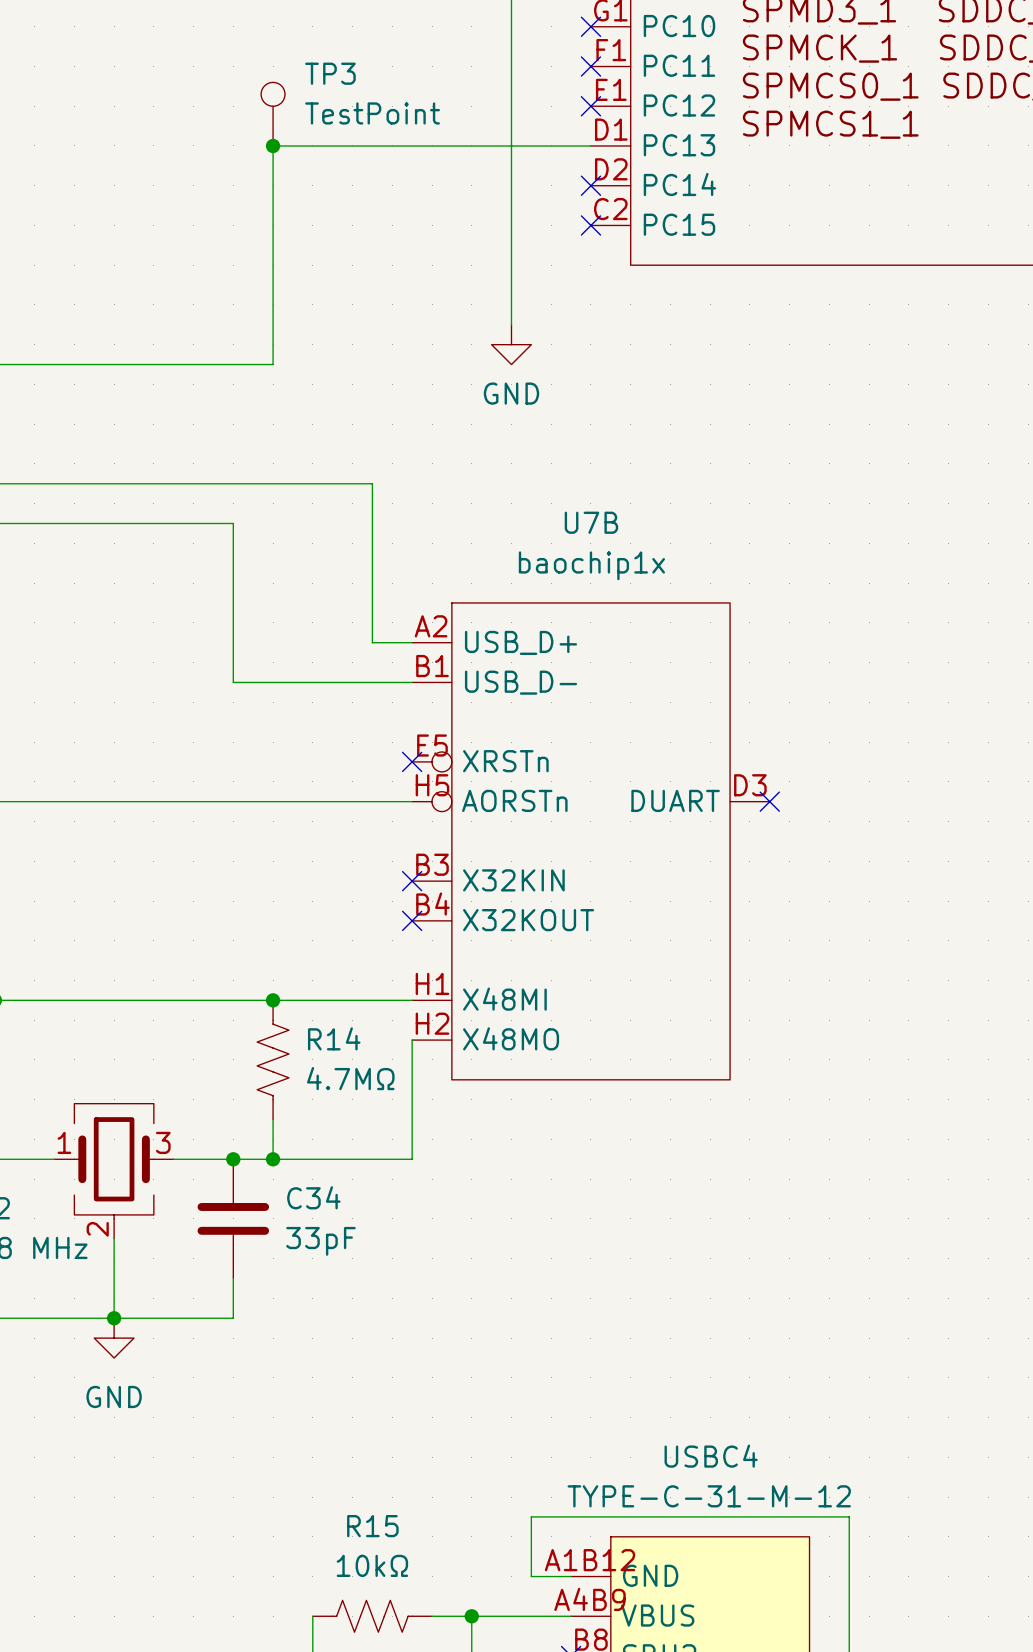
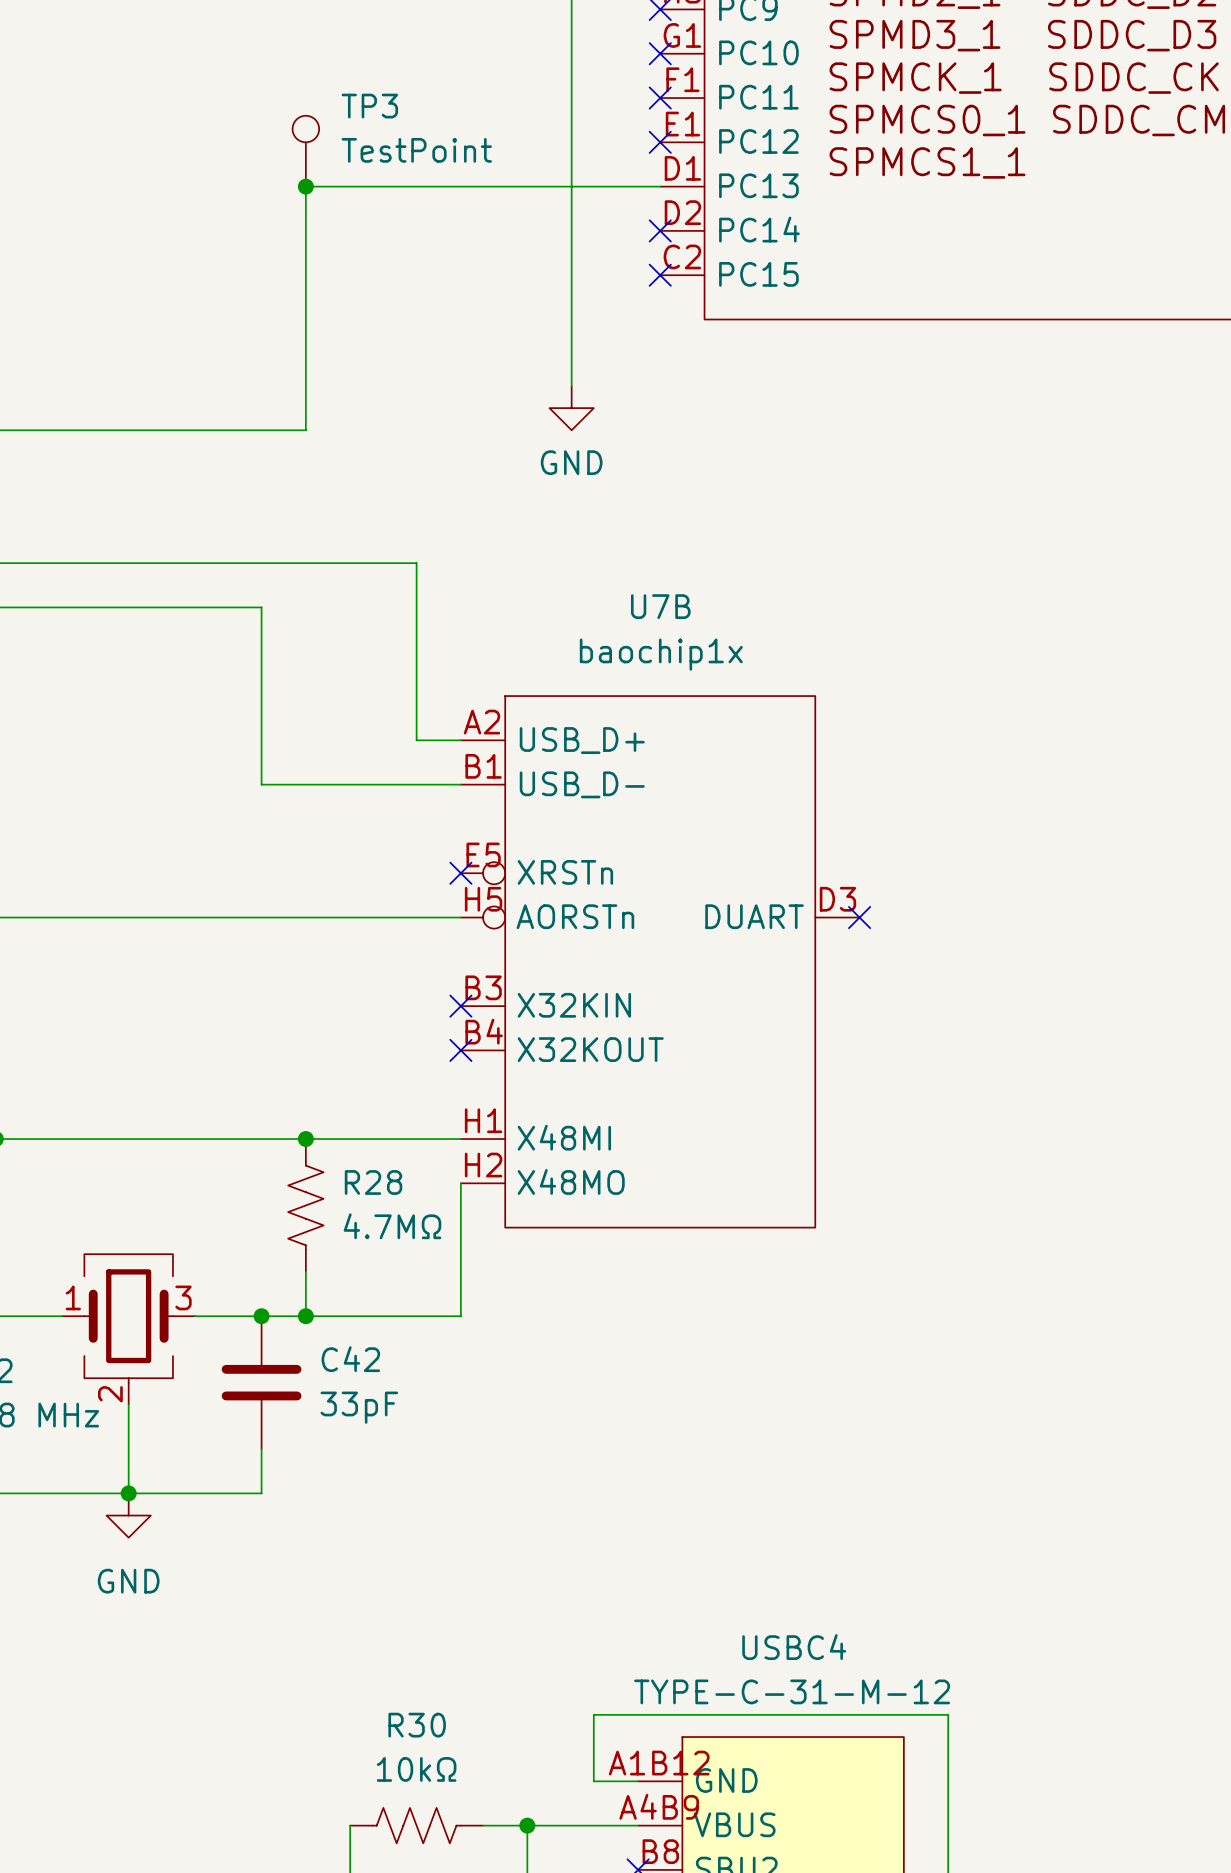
R14 name: R14 (334, 1038) -> R28 (373, 1182)
C34 name: C34 (313, 1197) -> C42 (350, 1359)
R15 name: R15 (372, 1526) -> R30 (417, 1725)

